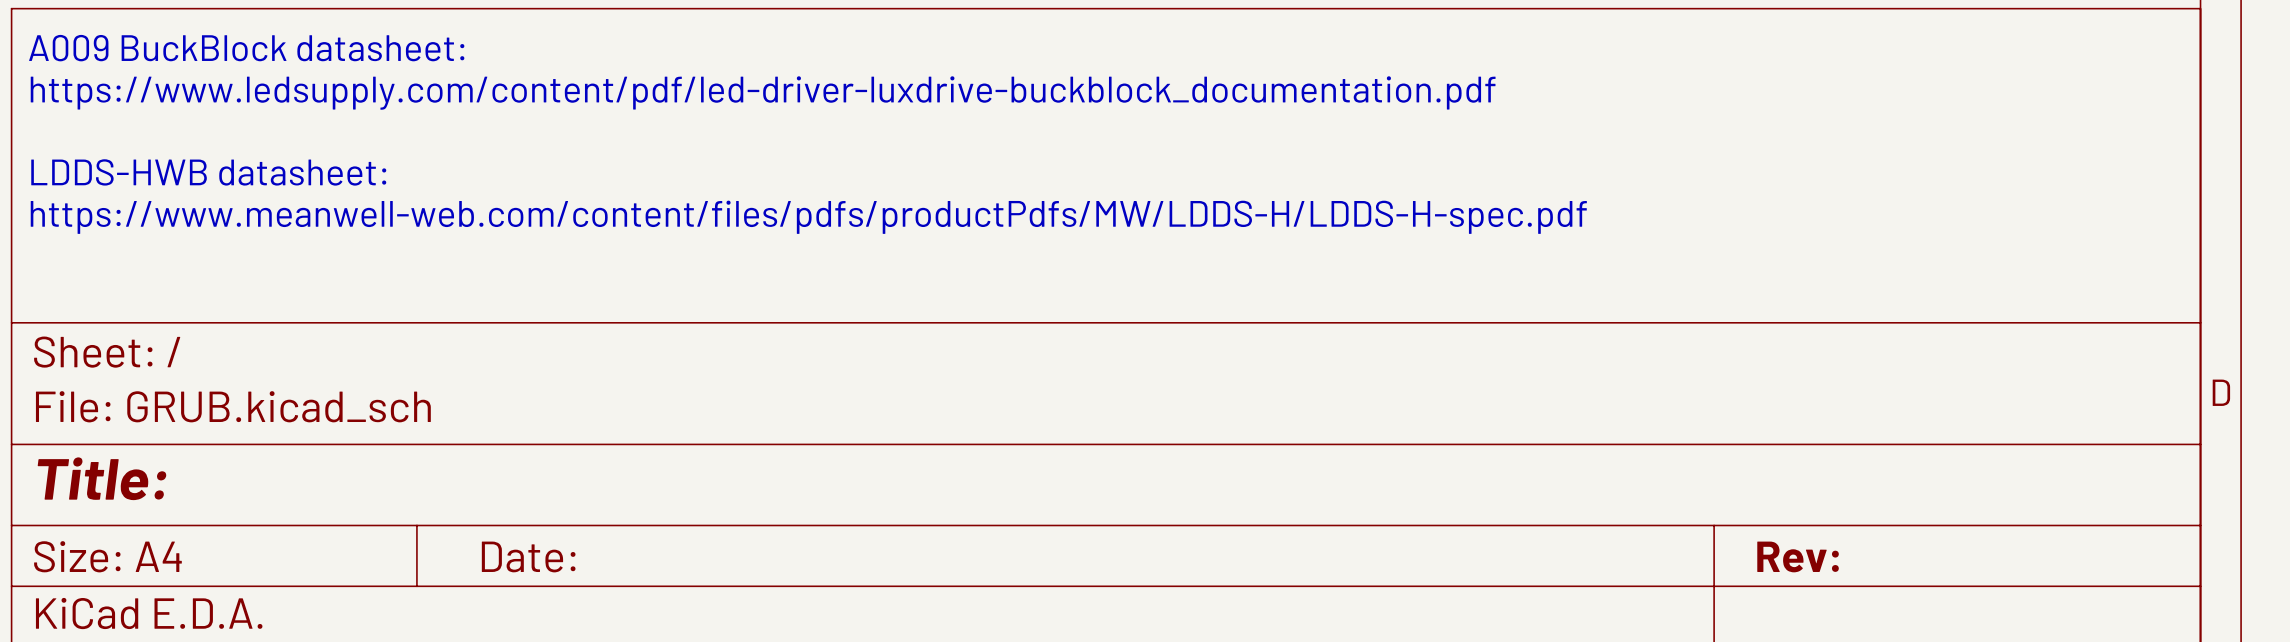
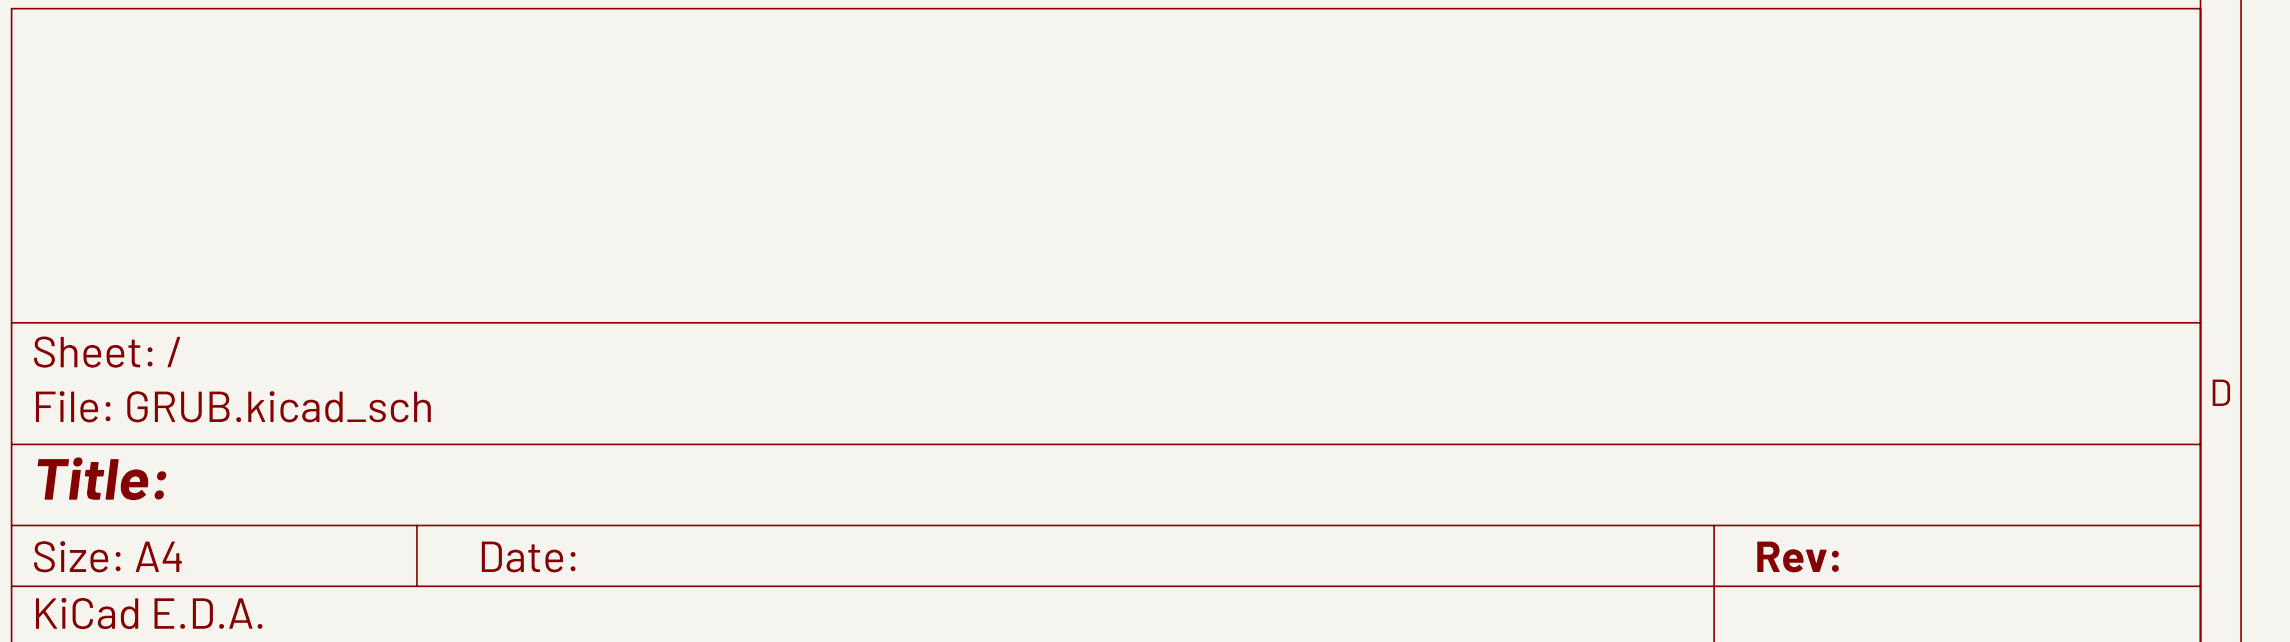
text: A009 BuckBlock datasheet: (246, 48) -> none
text: https://www.ledsupply.com/content/pdf/led-driver-luxdrive-buckblock_documentation.pdf (763, 93) -> none
text: LDDS-HWB datasheet: (208, 172) -> none
text: https://www.meanwell-web.com/content/files/pdfs/productPdfs/MW/LDDS-H/LDDS-H-spec.pdf (808, 217) -> none

